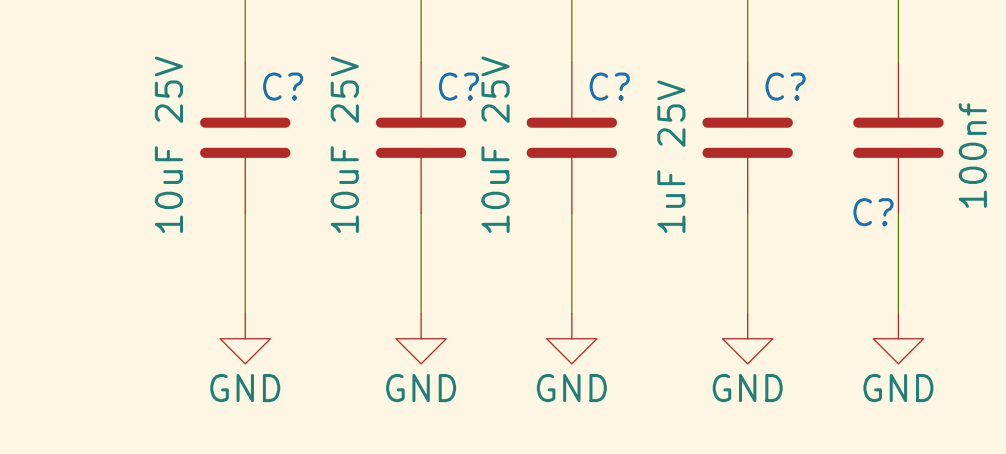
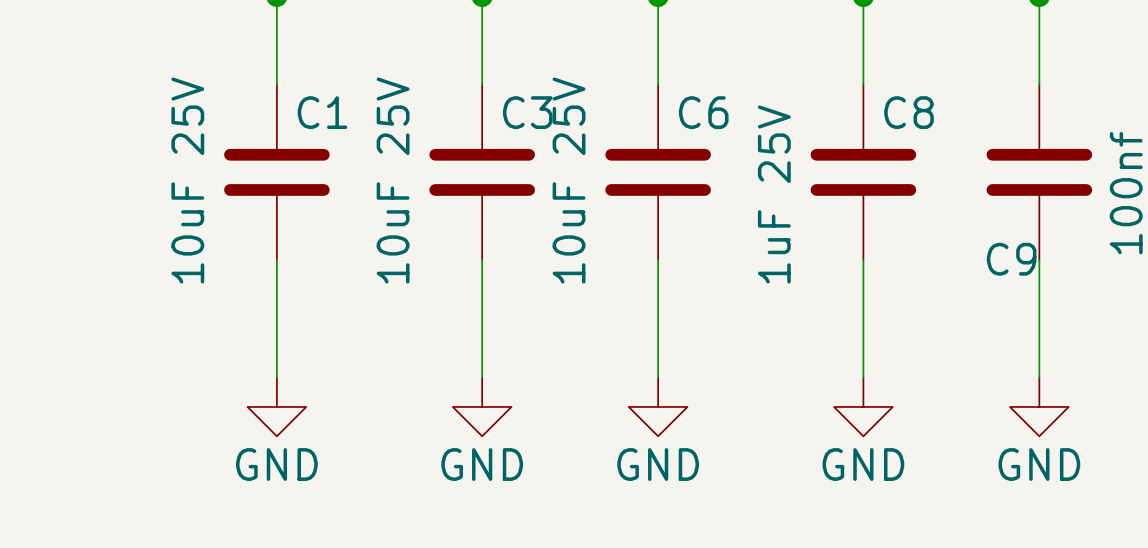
C? name: C? (283, 86) -> C1 (322, 112)
C? name: C? (458, 86) -> C3 (527, 112)
C? name: C? (609, 86) -> C6 (703, 112)
C? name: C? (785, 86) -> C8 (909, 112)
C? name: C? (873, 212) -> C9 (1011, 259)

